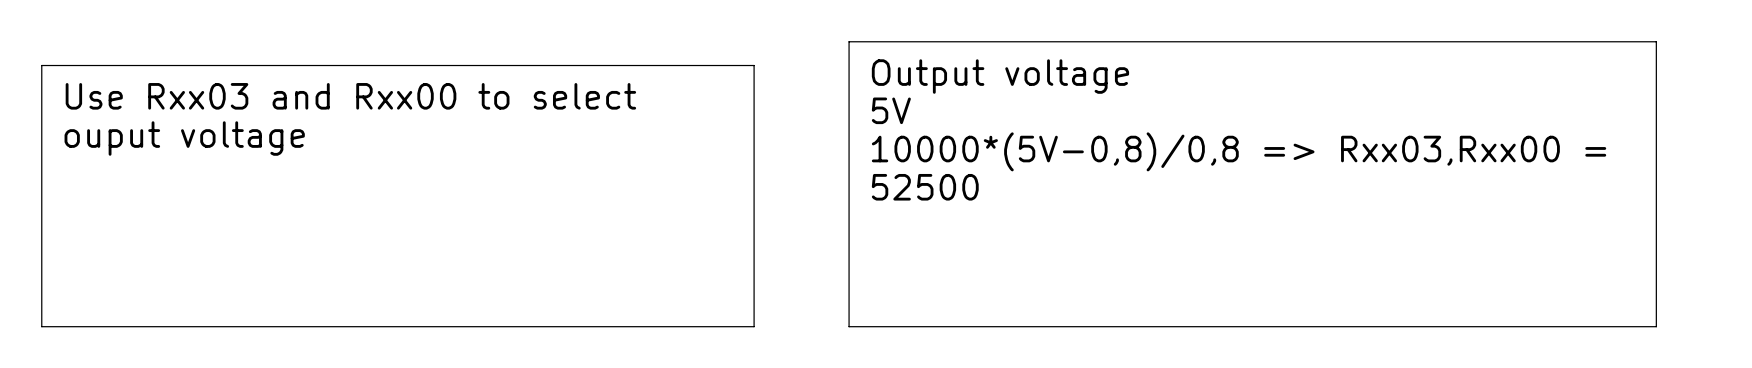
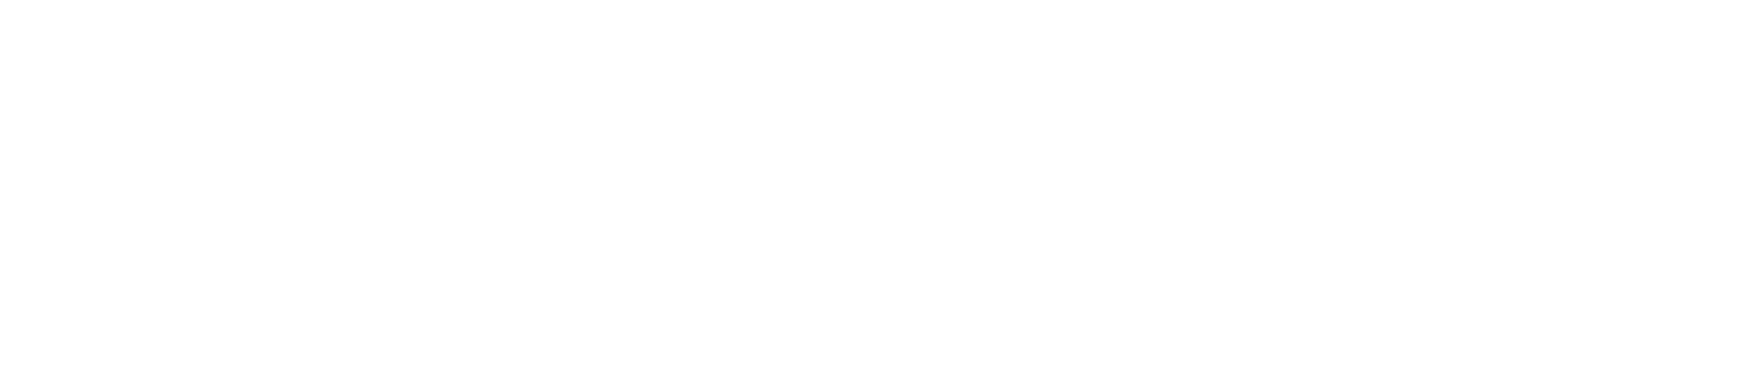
line: (849, 41) (1656, 41) (1656, 326) (849, 326) (849, 41) -> none
line: (41, 65) (754, 65) (754, 326) (41, 326) (41, 65) -> none
text: Output voltage (1000, 76) -> none
text: Use Rxx03 and Rxx00 to select (350, 96) -> none
text: 5V (891, 110) -> none
text: ouput voltage (184, 138) -> none
text: 10000*(5V-0,8)/0,8 => Rxx03,Rxx00 = (1239, 151) -> none
text: 52500 (925, 187) -> none

